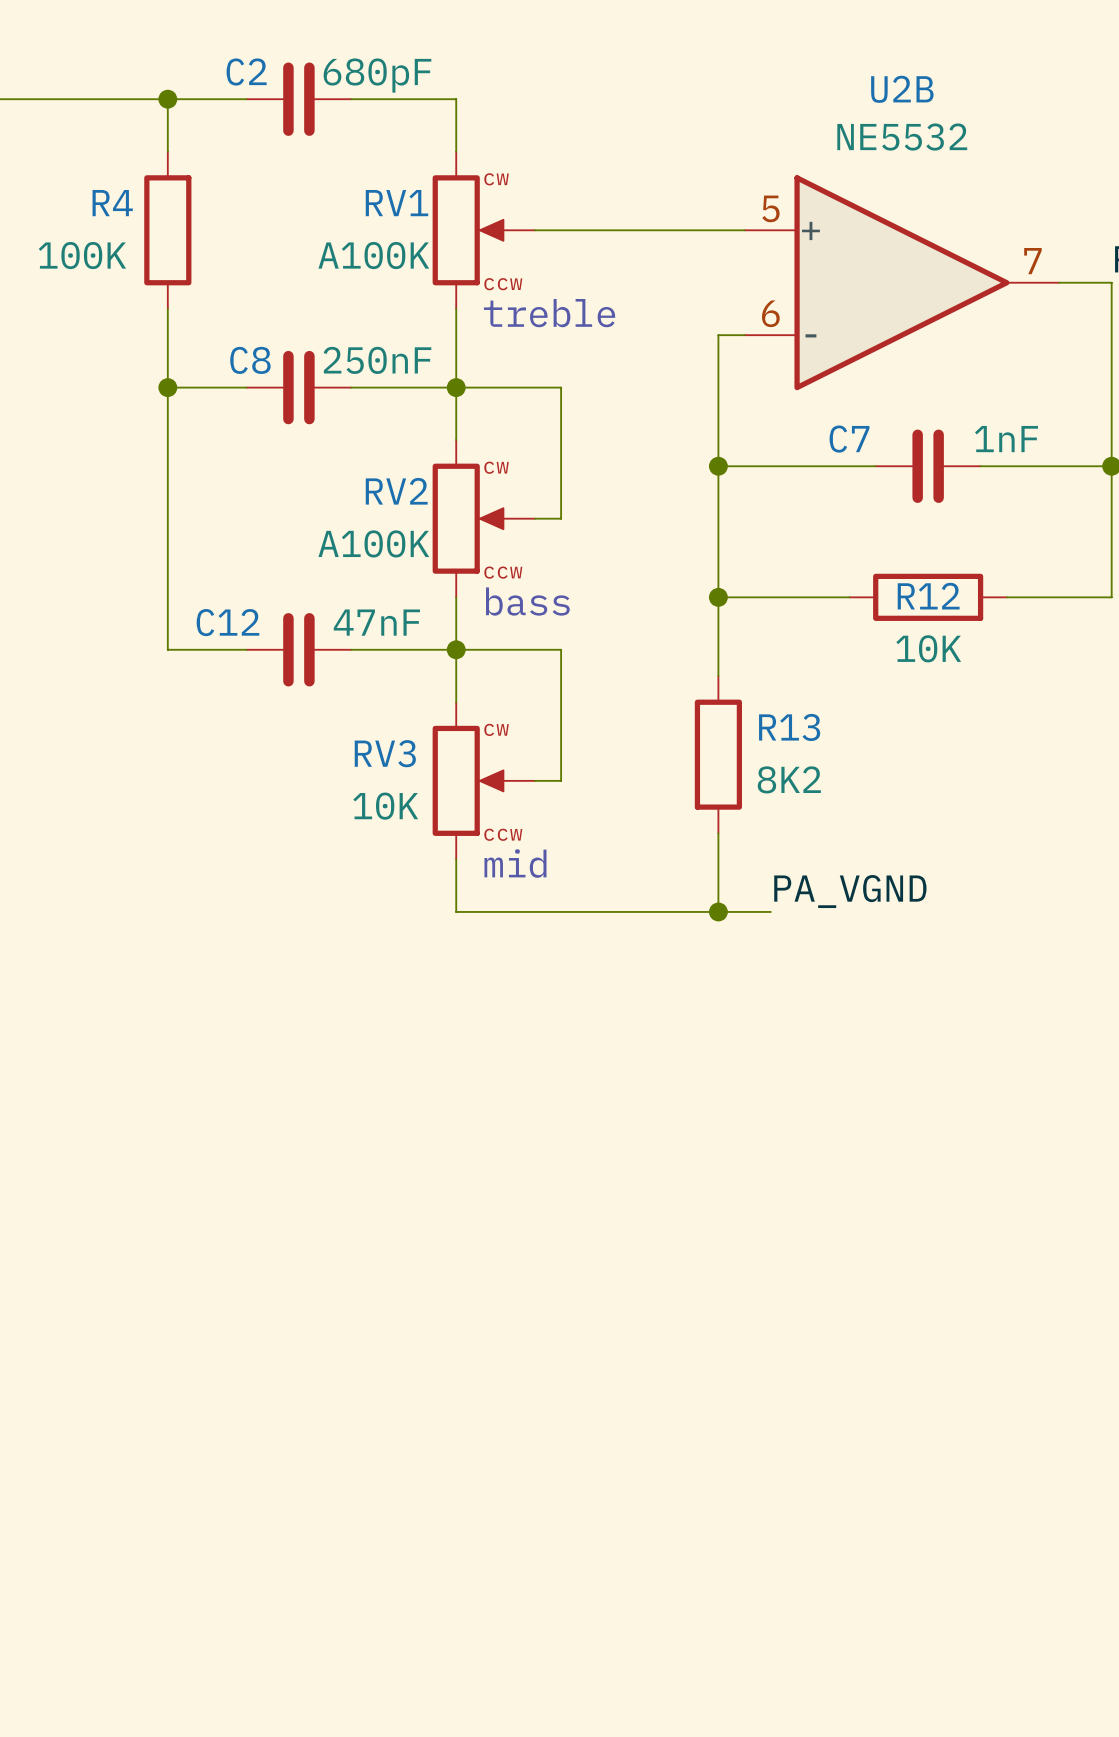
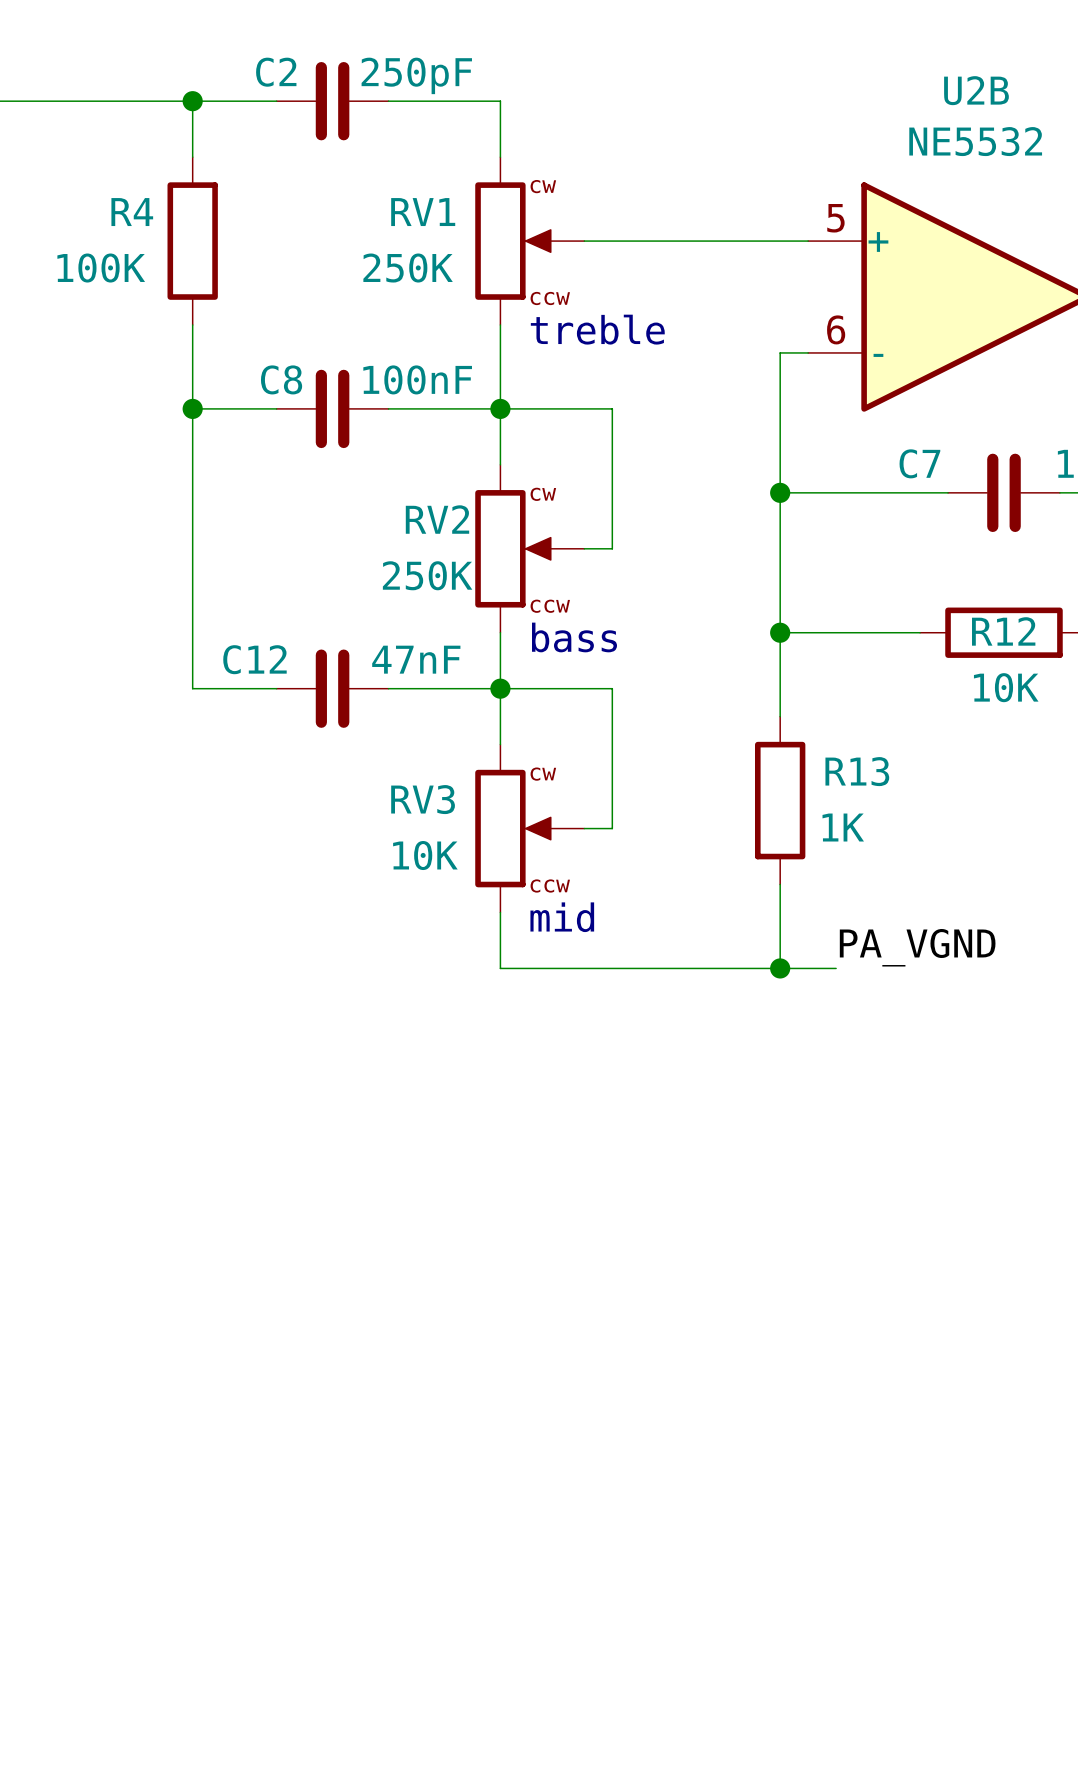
C2 value: 680pF (377, 75) -> 250pF (416, 75)
RV1 name position: RV1 (397, 203) -> RV1 (423, 212)
RV1 value: A100K (373, 255) -> 250K (408, 268)
C8 value: 250nF (377, 360) -> 100nF (417, 379)
RV2 value: A100K (373, 543) -> 250K (427, 575)
R13 value: 8K2 (789, 779) -> 1K (843, 827)

